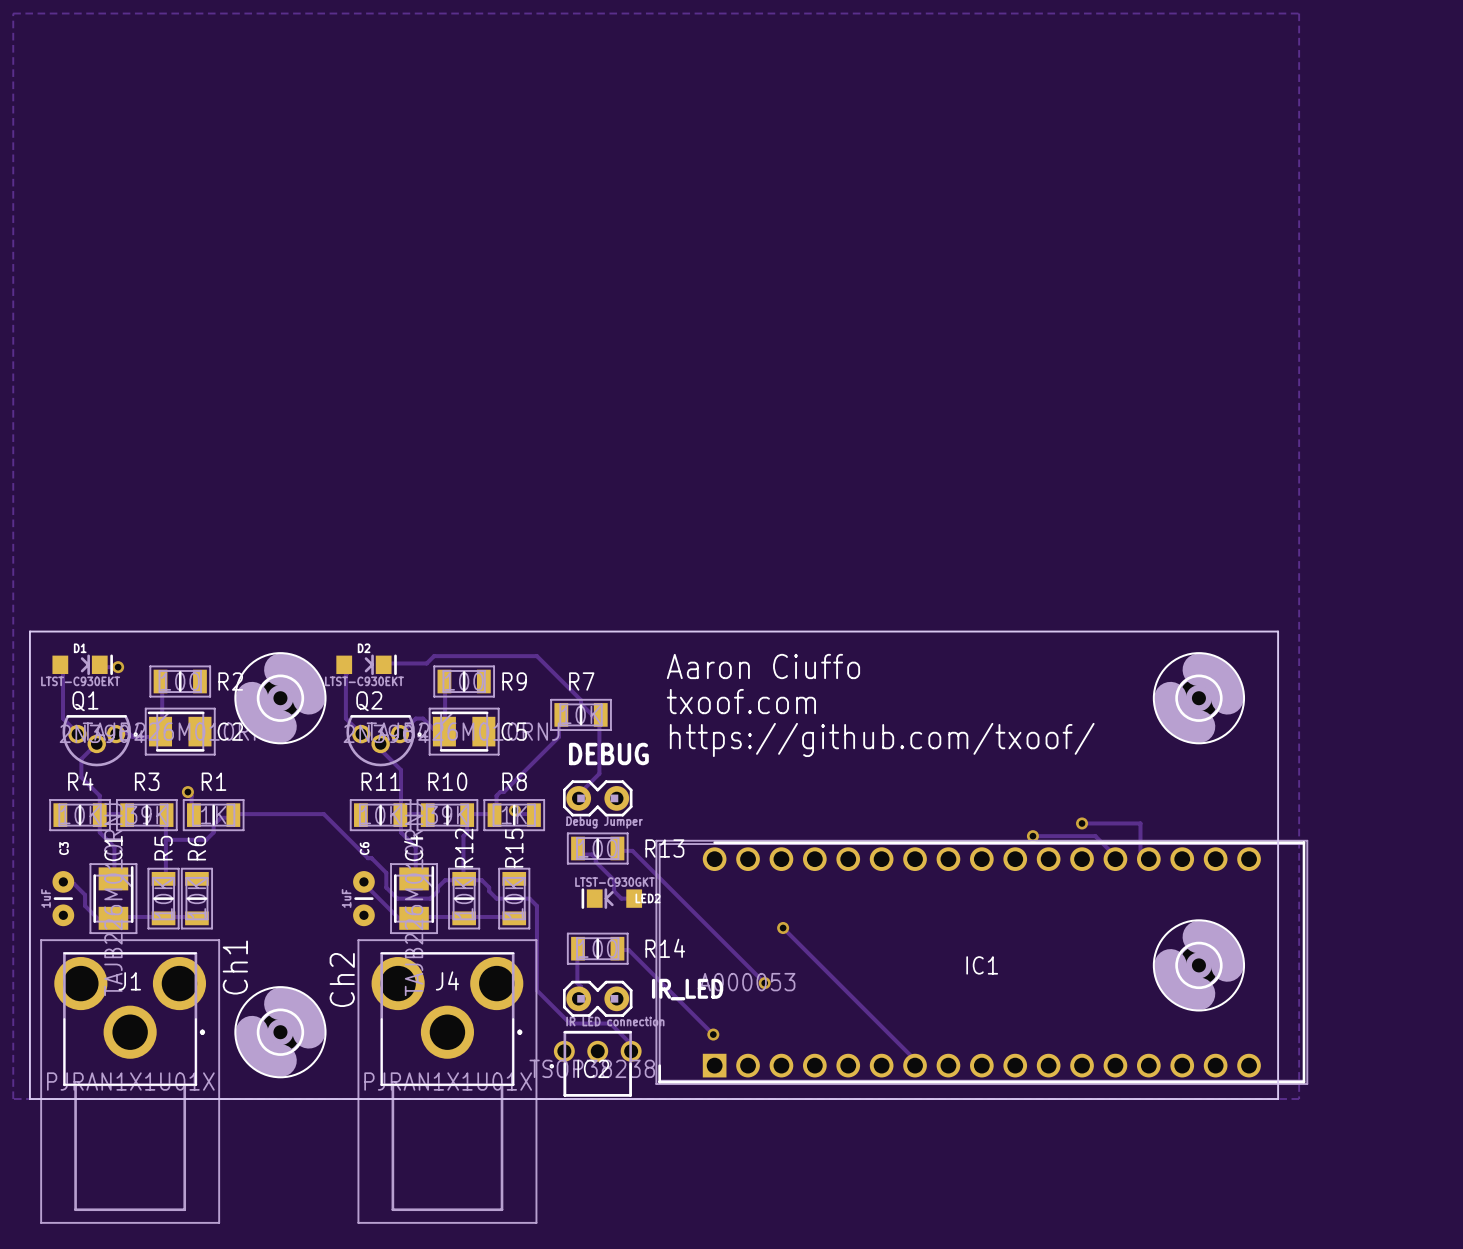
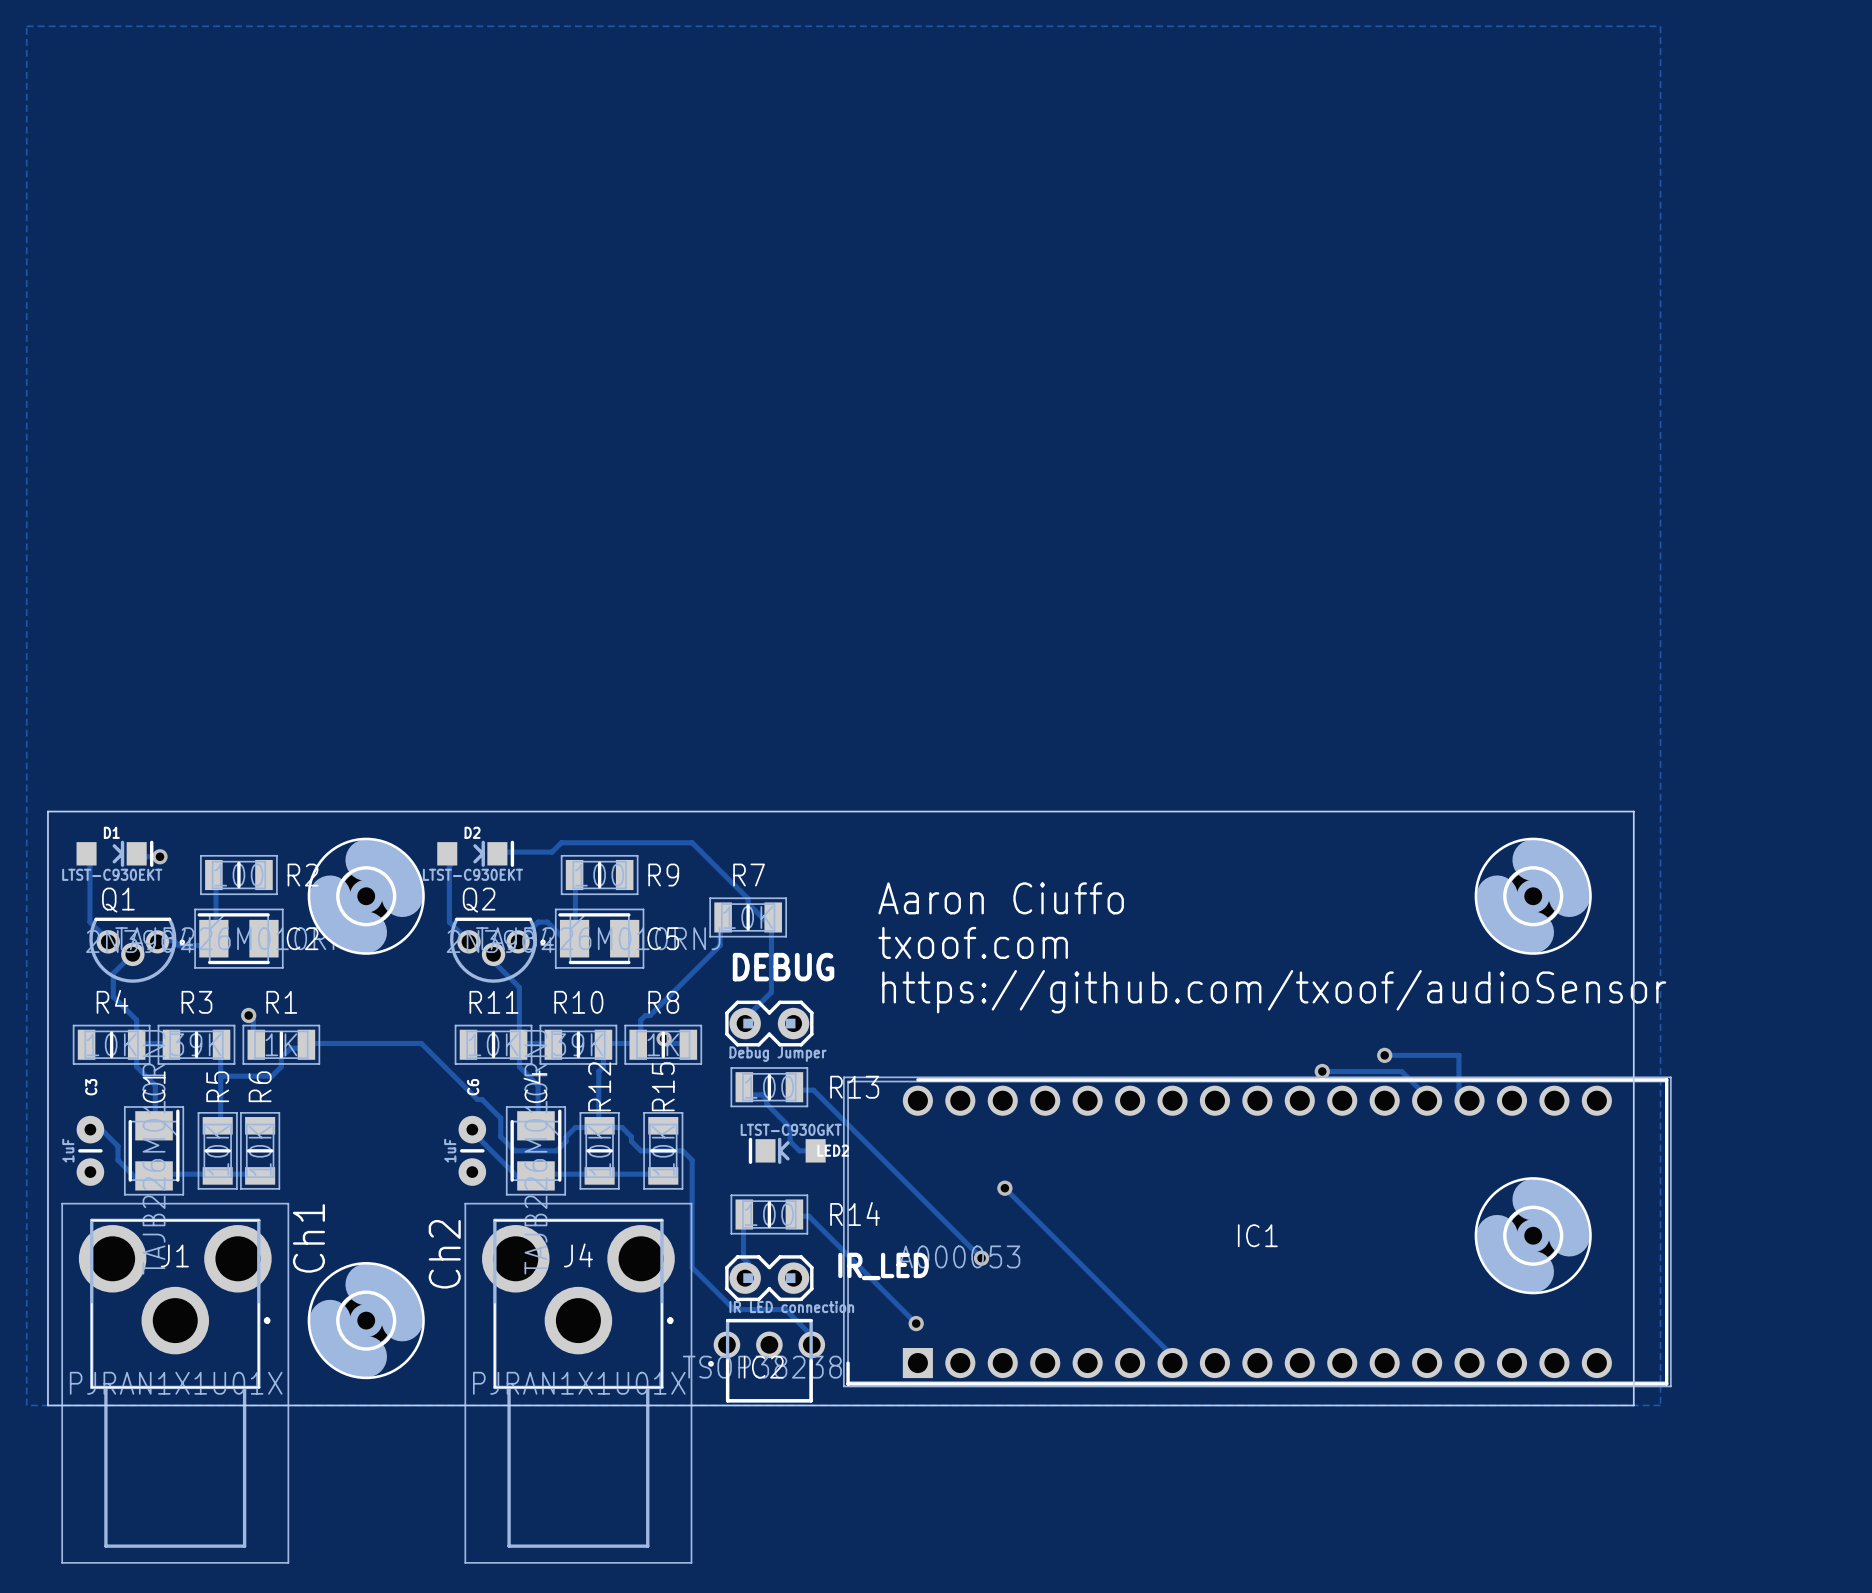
text position: Aaron Ciuffo (763, 666) -> Aaron Ciuffo (1001, 898)
text position: txoof.com (741, 701) -> txoof.com (973, 942)
text: https://github.com/txoof/ (882, 739) -> https://github.com/txoof/audioSensor (1274, 991)

